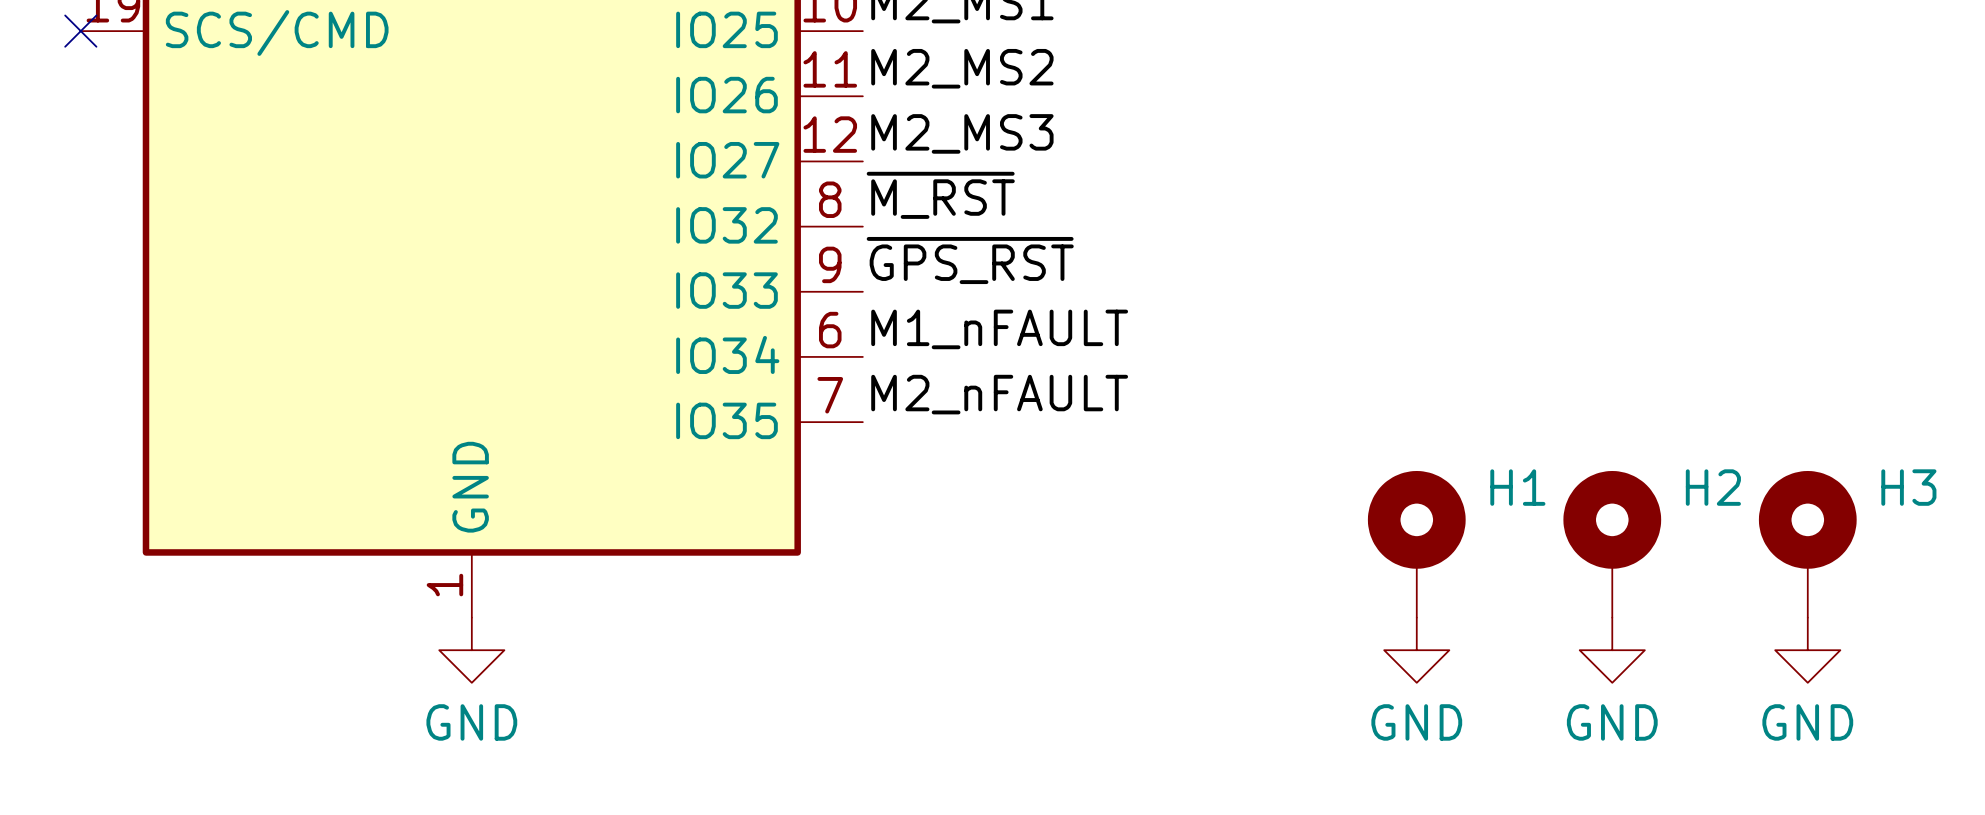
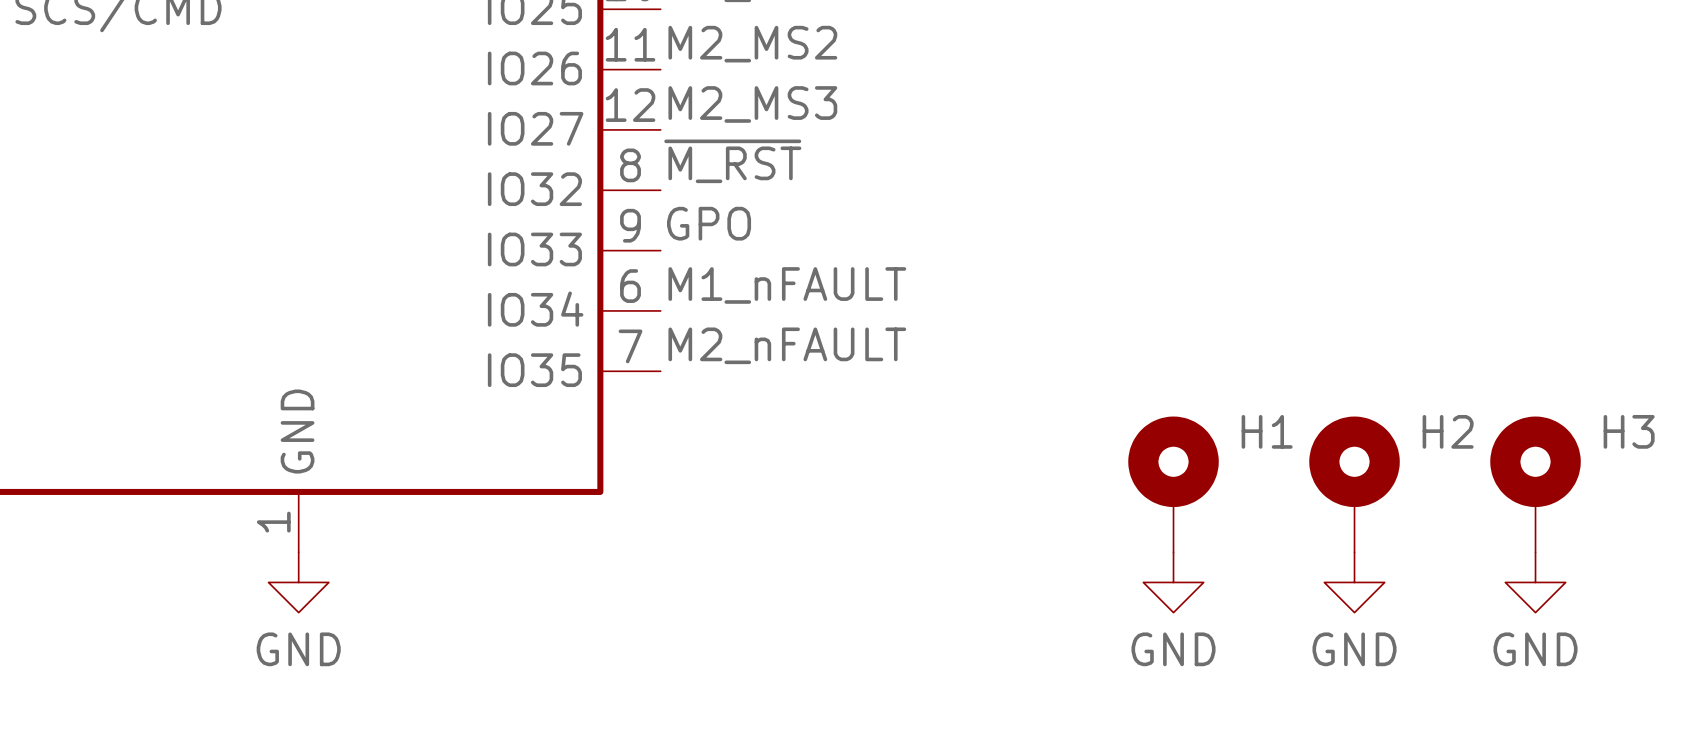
label: ~{GPS_RST} (970, 260) -> GPO (709, 223)

